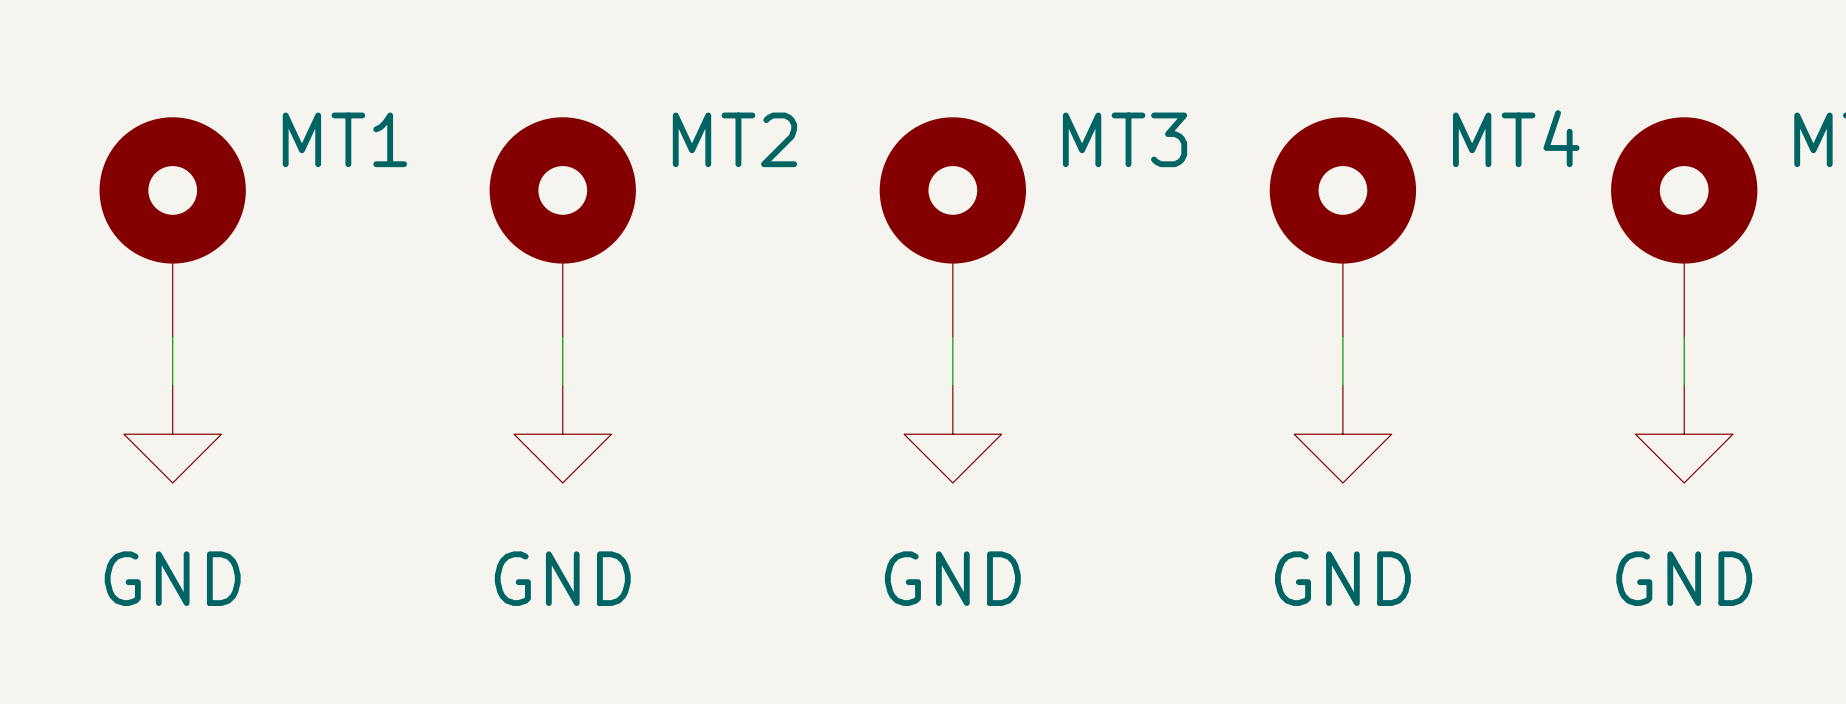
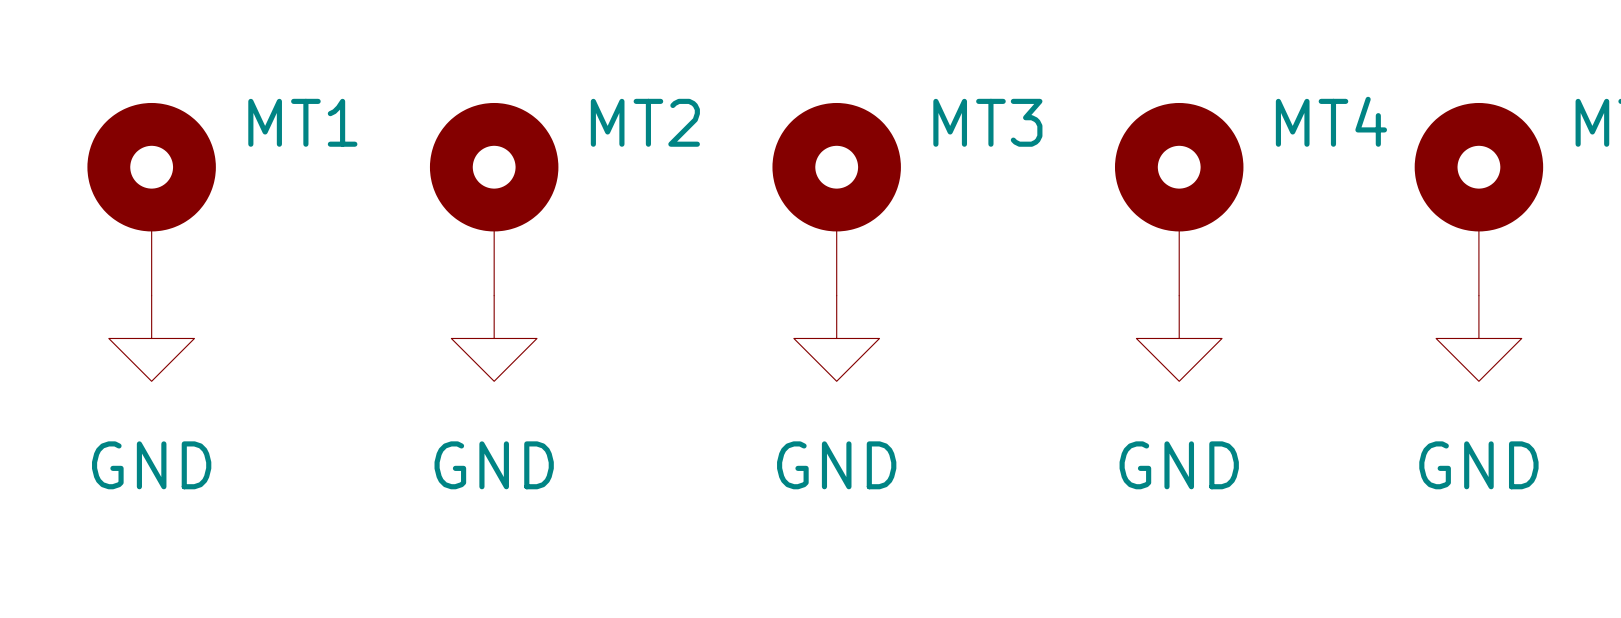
power symbol position: GND (172, 434) -> GND (151, 338)
power symbol position: GND (562, 434) -> GND (494, 338)
power symbol position: GND (952, 434) -> GND (836, 338)
power symbol position: GND (1342, 434) -> GND (1179, 338)
power symbol position: GND (1684, 434) -> GND (1478, 338)

